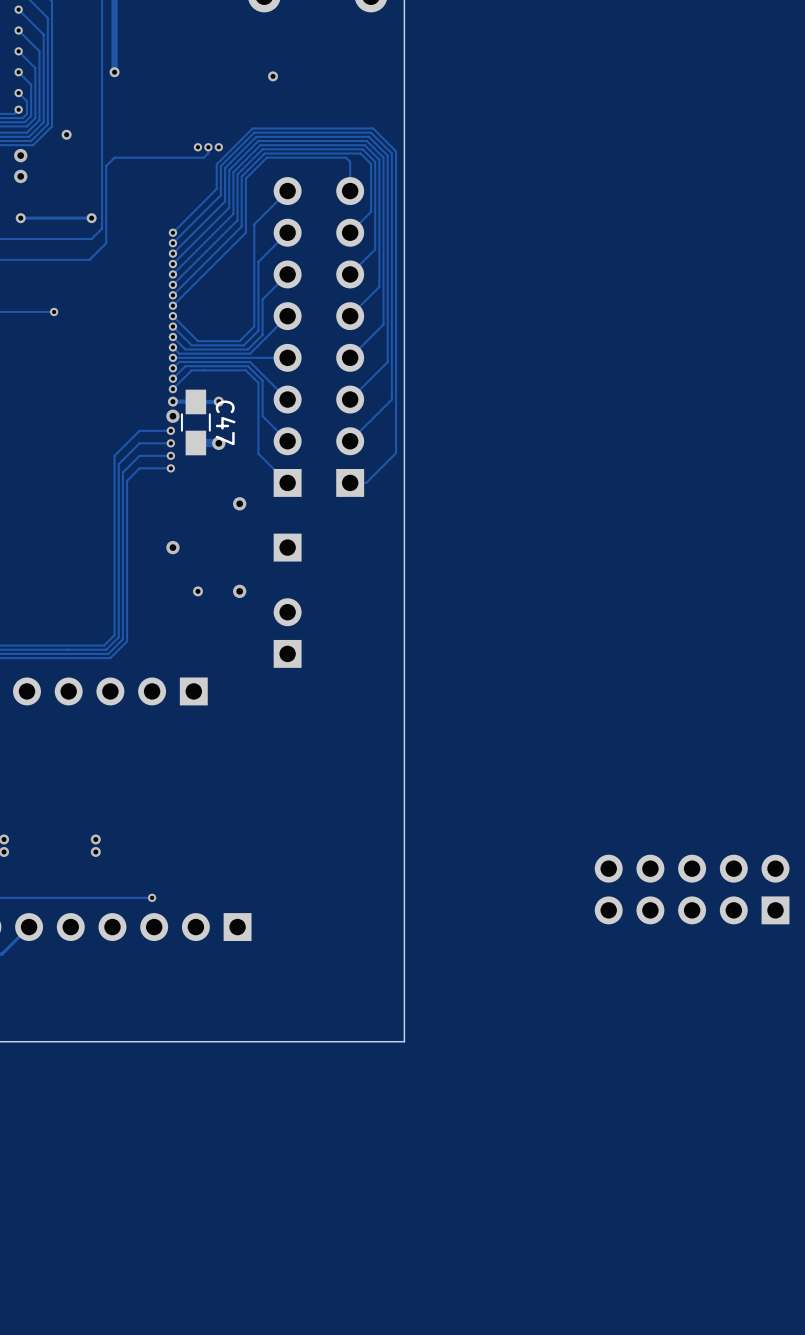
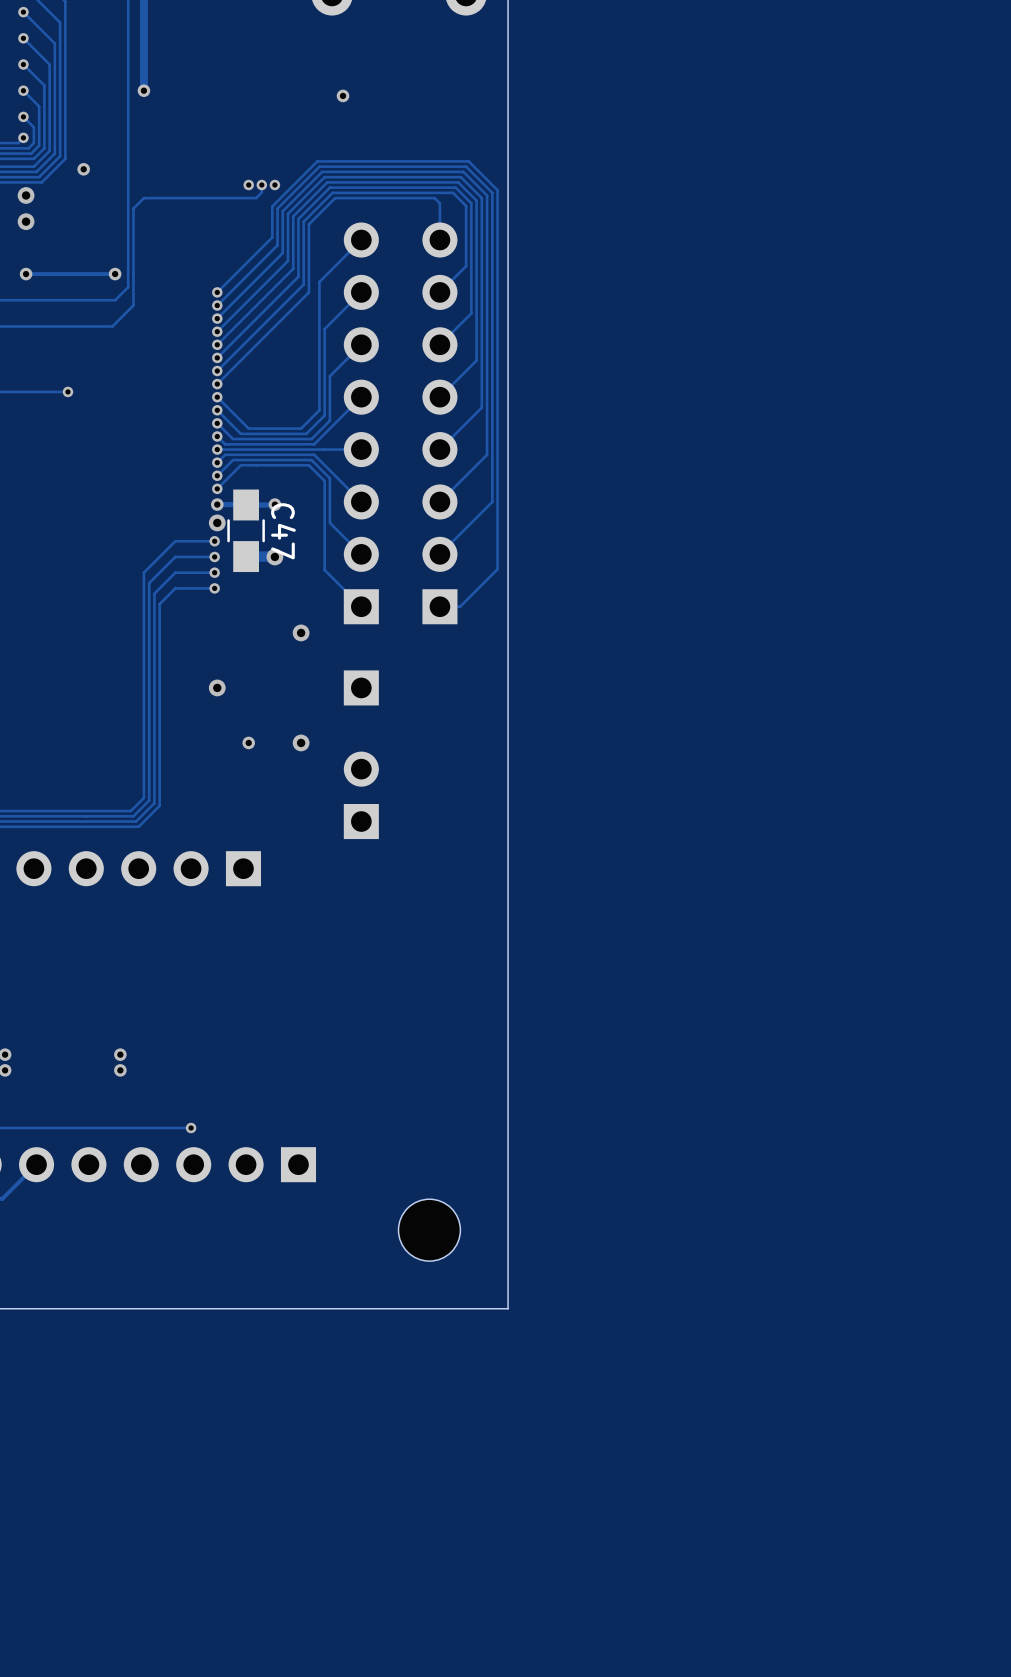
part: (692, 889) -> none
part: none -> (429, 1230)

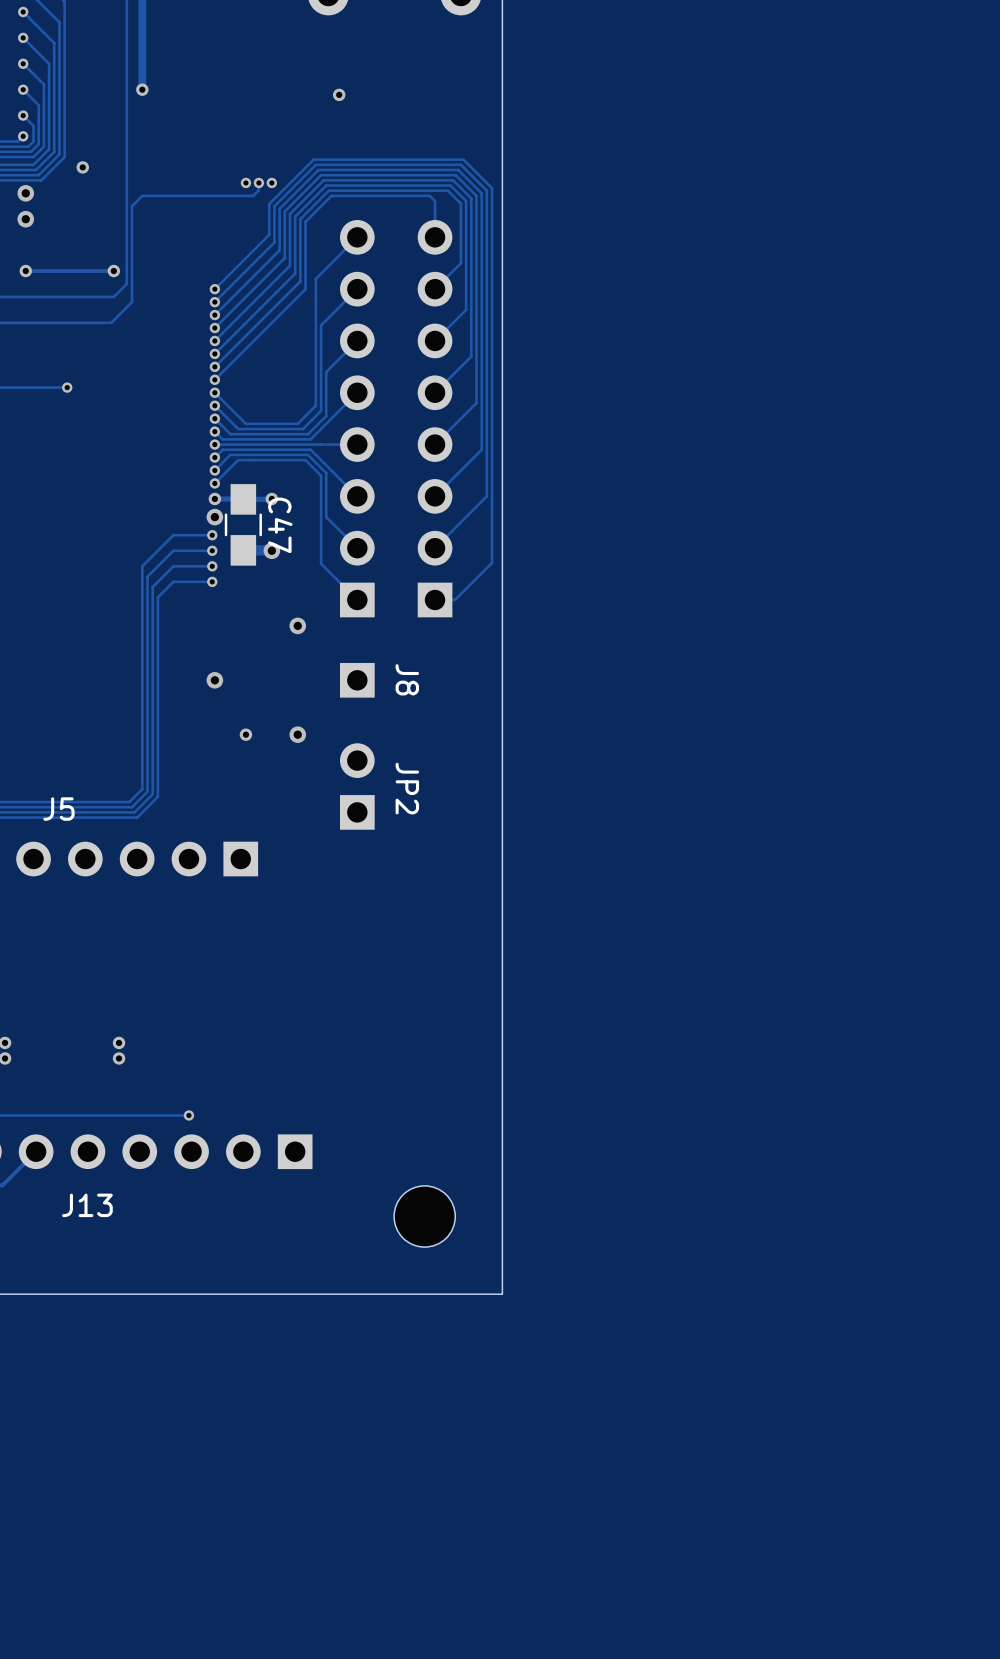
J8 name: none -> J8 (407, 679)
JP2 name: none -> JP2 (407, 788)
J5 name: none -> J5 (58, 809)
J13 name: none -> J13 (87, 1205)

